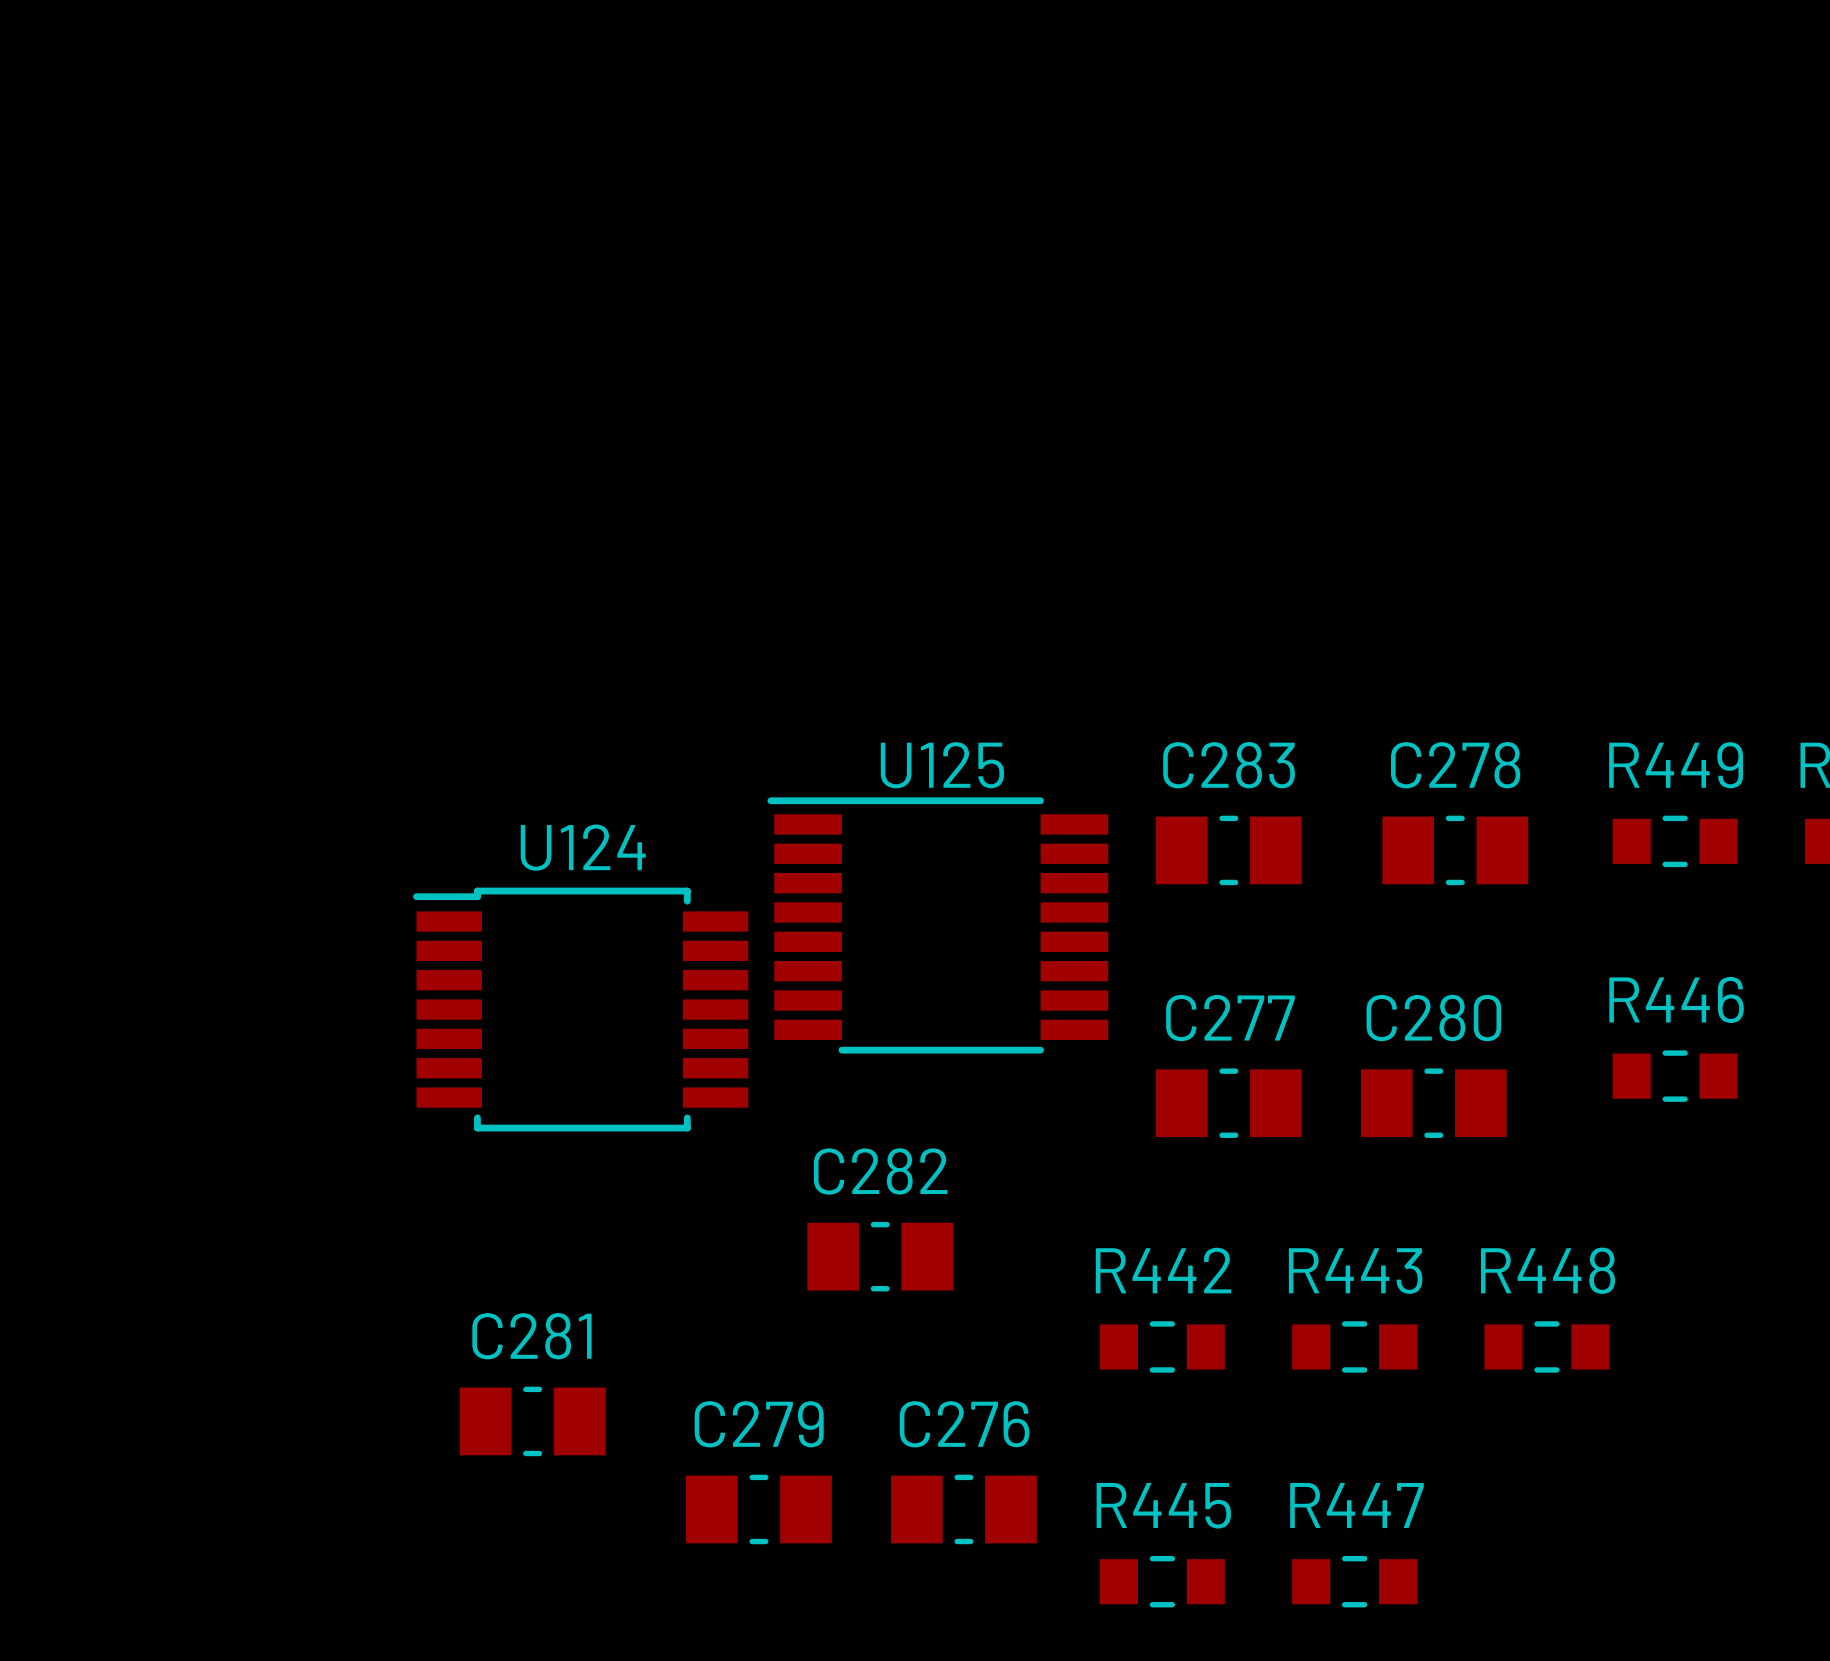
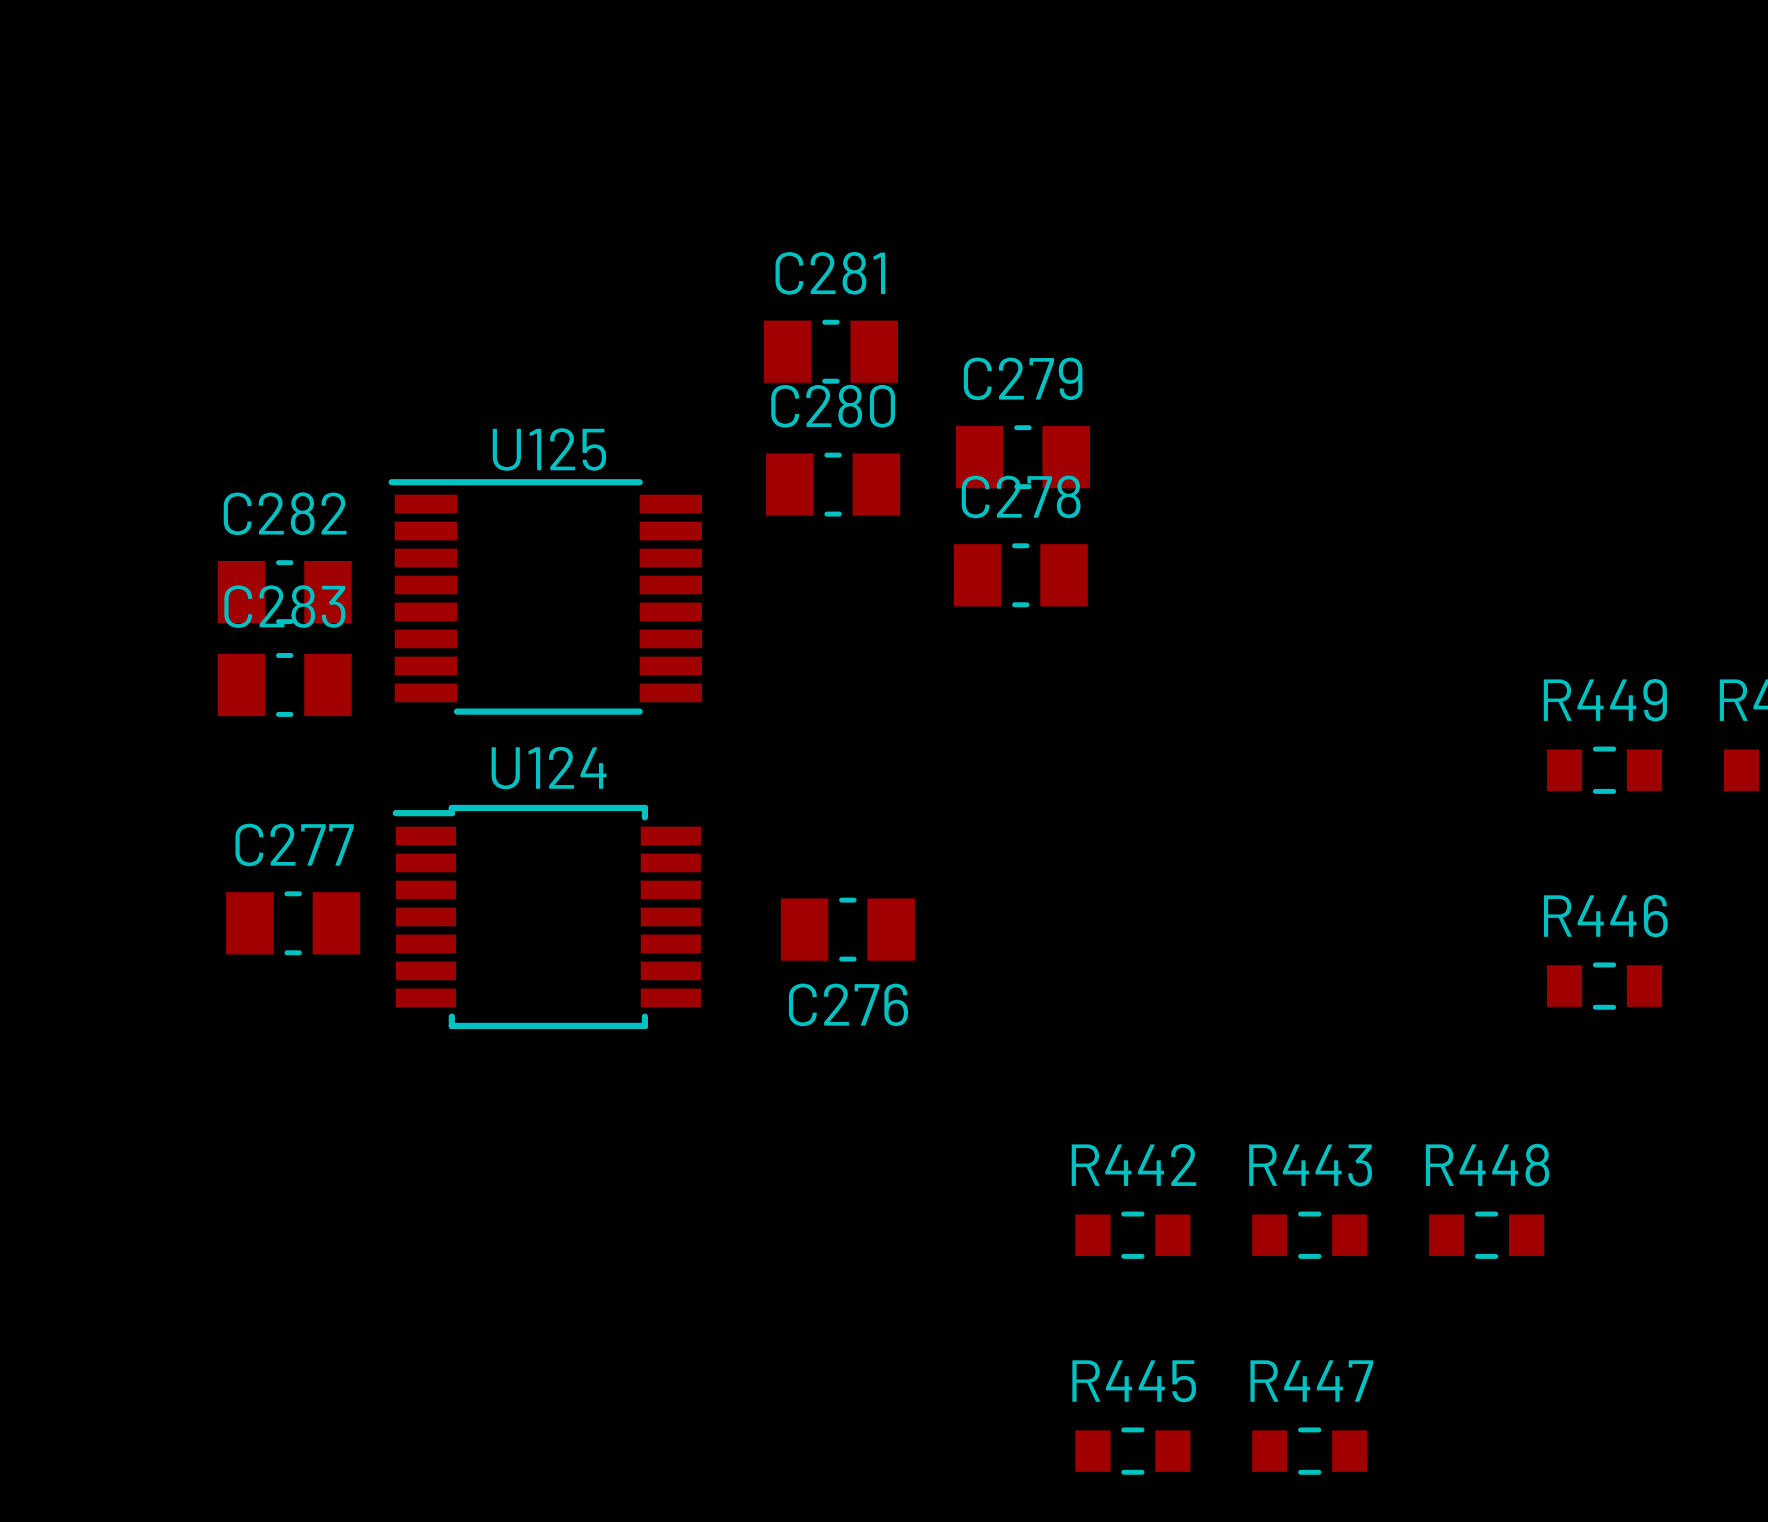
C283 position: (1228, 850) -> (284, 684)
C278 position: (1455, 850) -> (1020, 575)
U125 position: (937, 925) -> (545, 596)
U124 position: (580, 1009) -> (546, 916)
C277 position: (1228, 1103) -> (293, 923)
C280 position: (1433, 1103) -> (833, 484)
C282 position: (880, 1256) -> (284, 592)
C281 position: (532, 1421) -> (830, 351)
C276 name position: C276 (964, 1424) -> C276 (848, 1004)
C279 position: (758, 1509) -> (1022, 457)
C276 position: (963, 1509) -> (847, 929)

